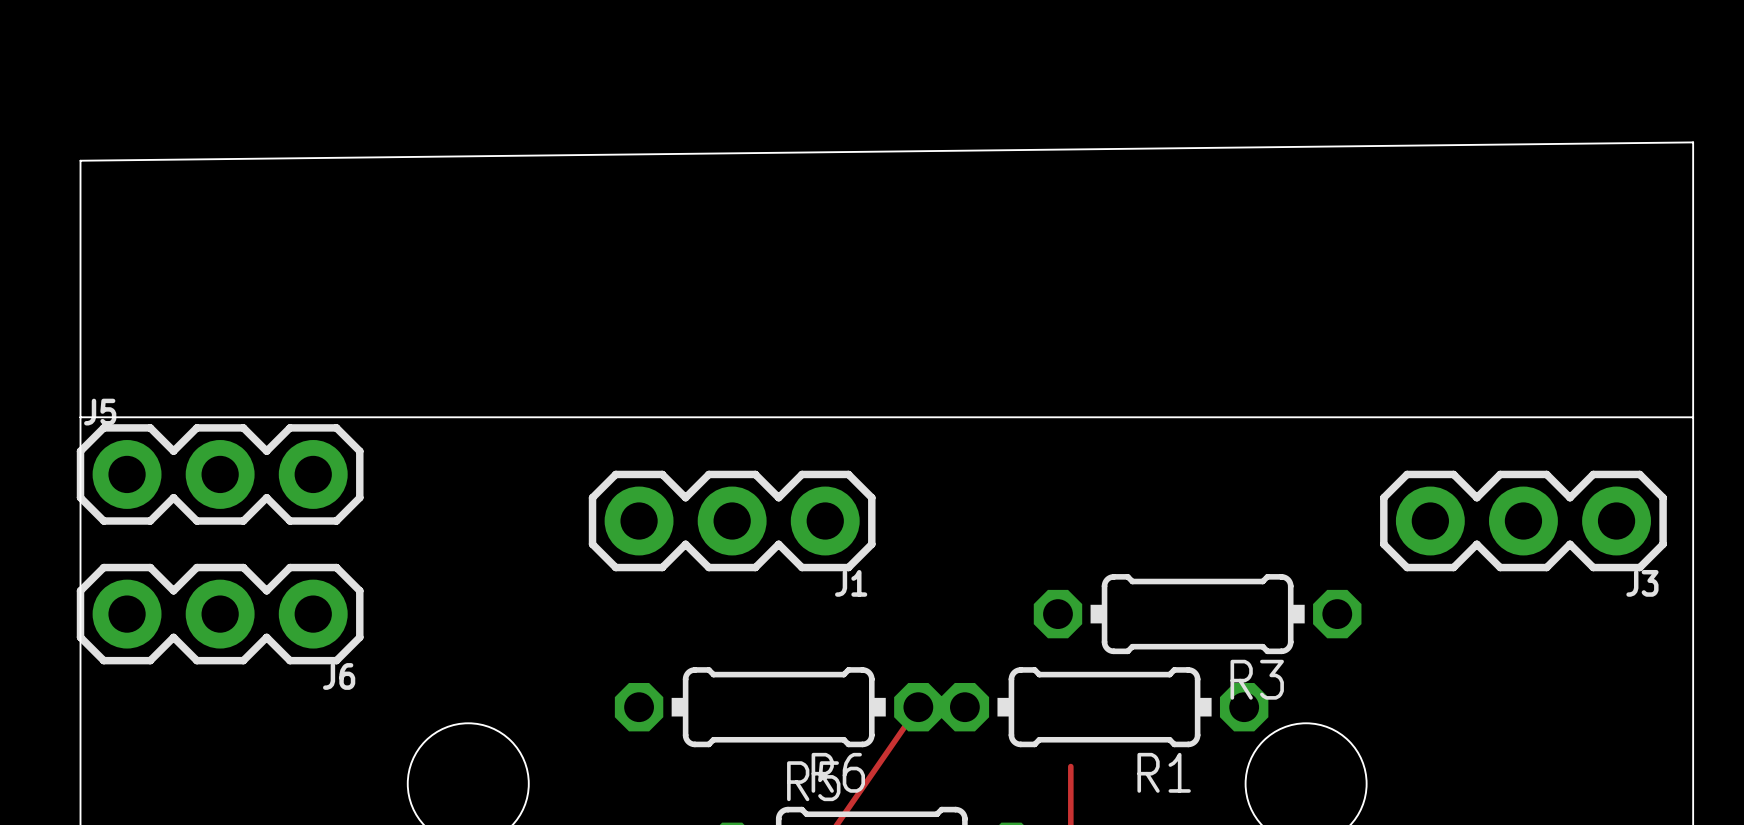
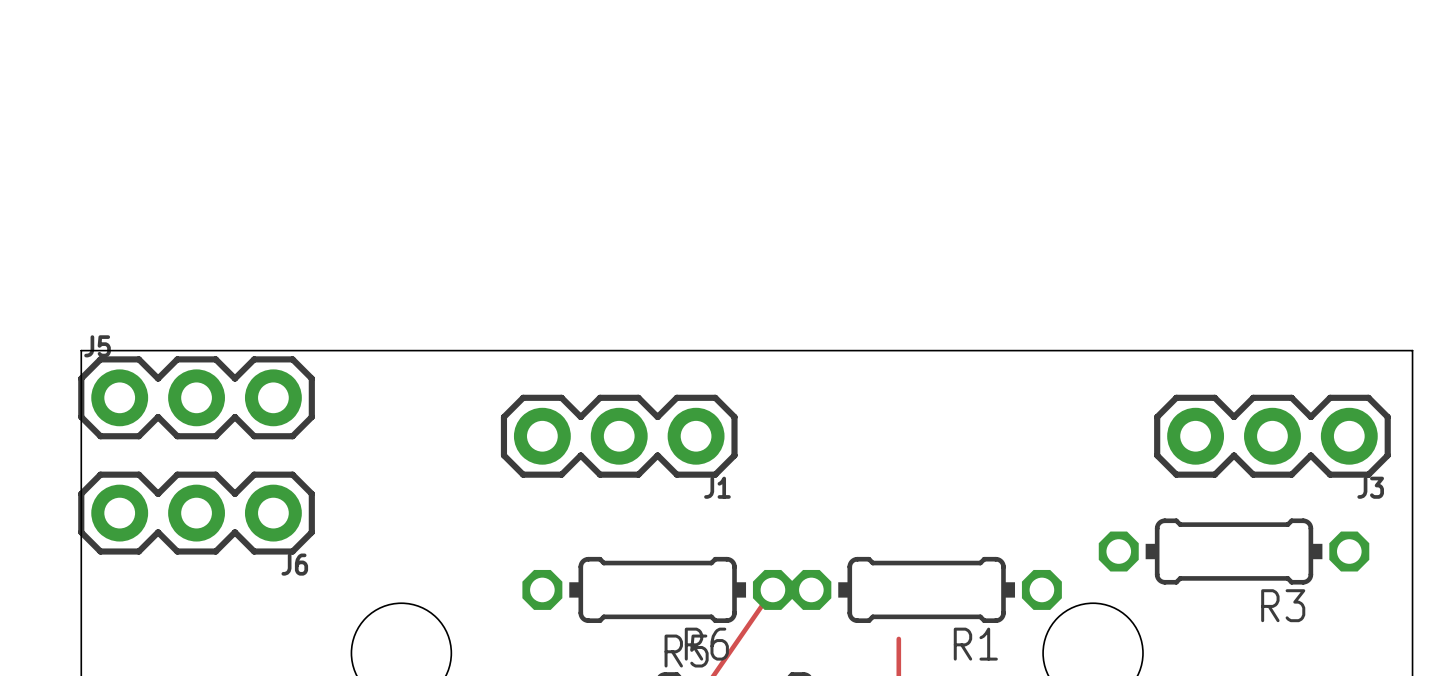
board edge: (80, 417) (80, 160) (1693, 142) (1693, 417) -> none
R3 position: (1197, 614) -> (1234, 551)

